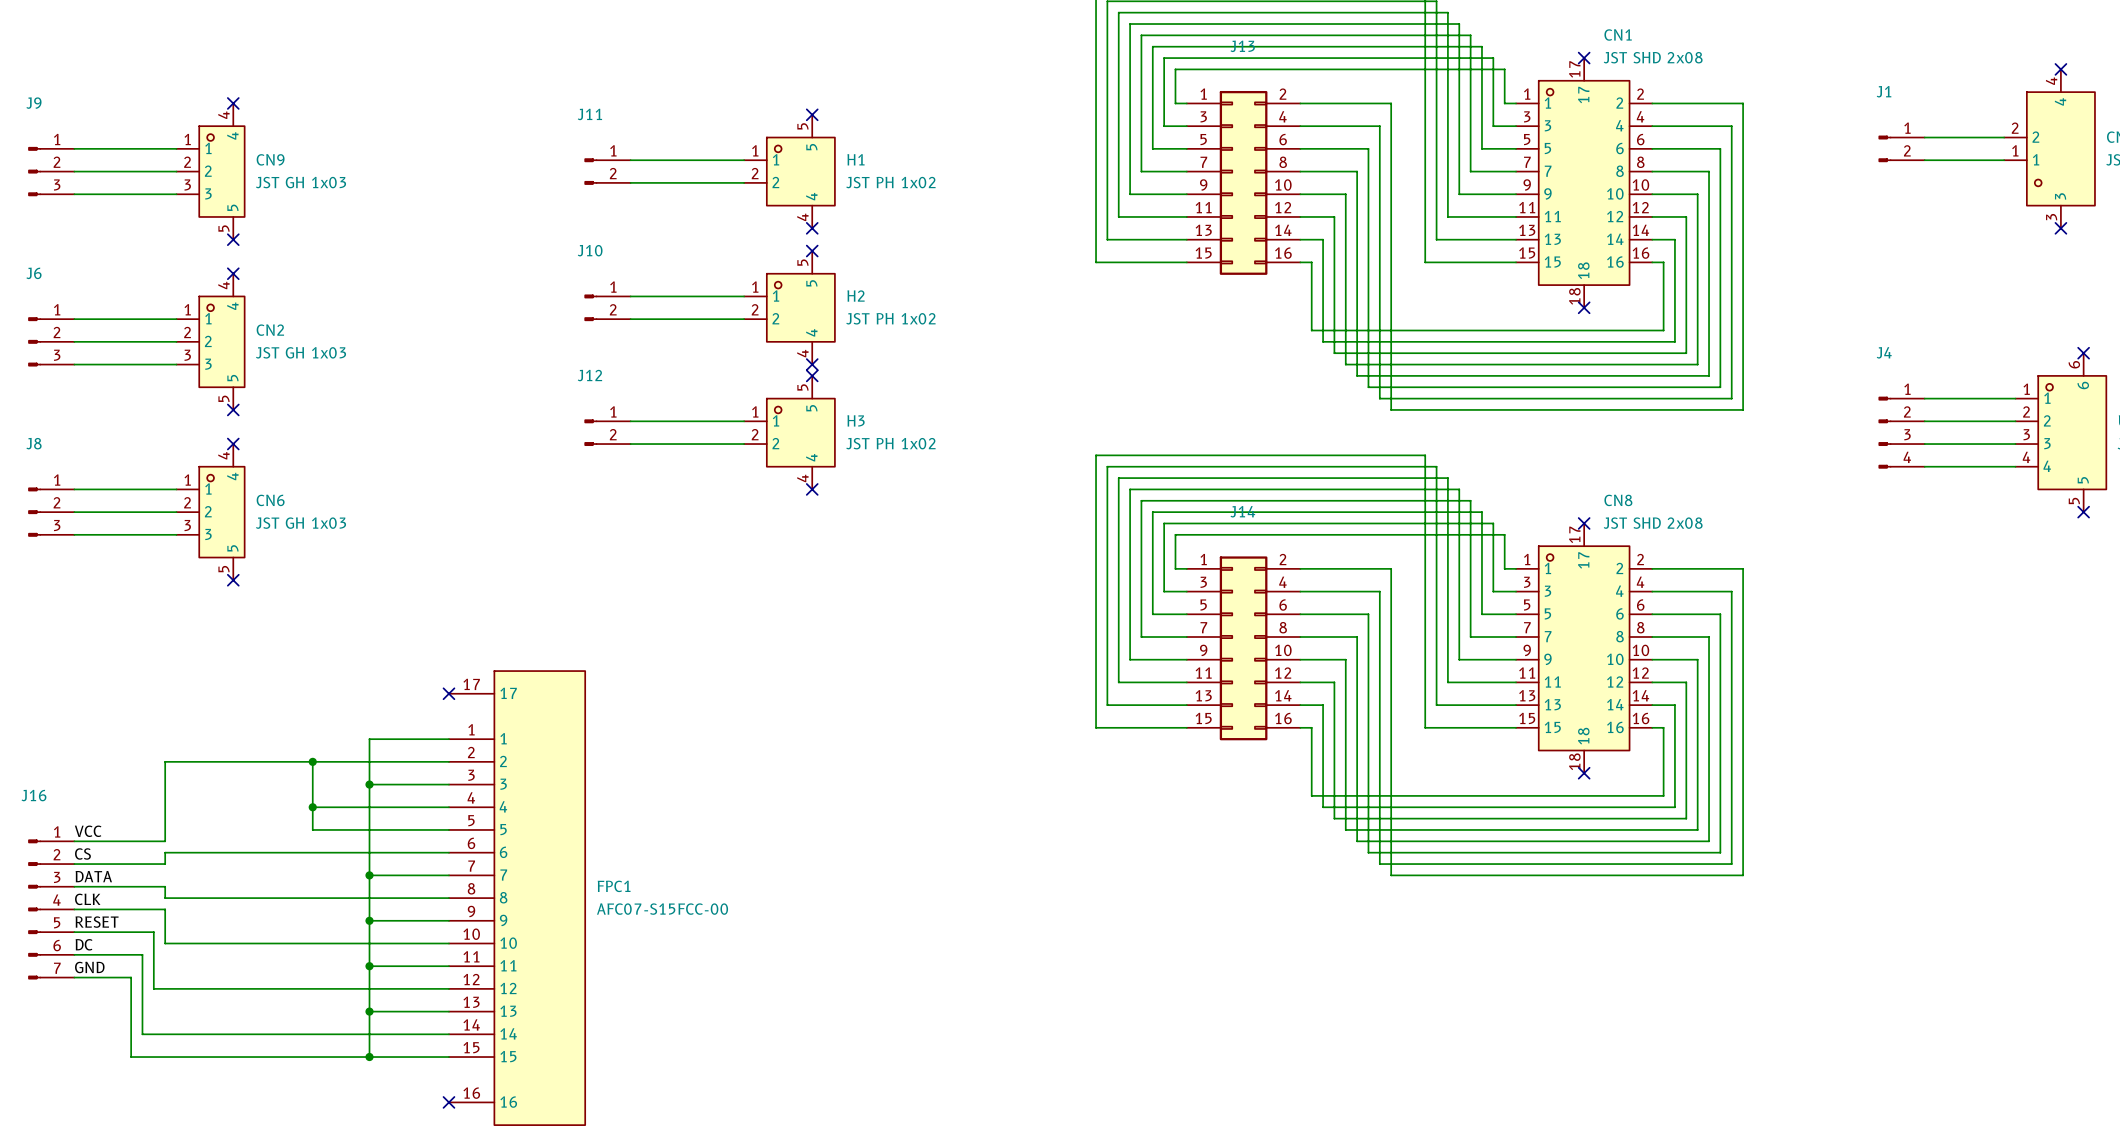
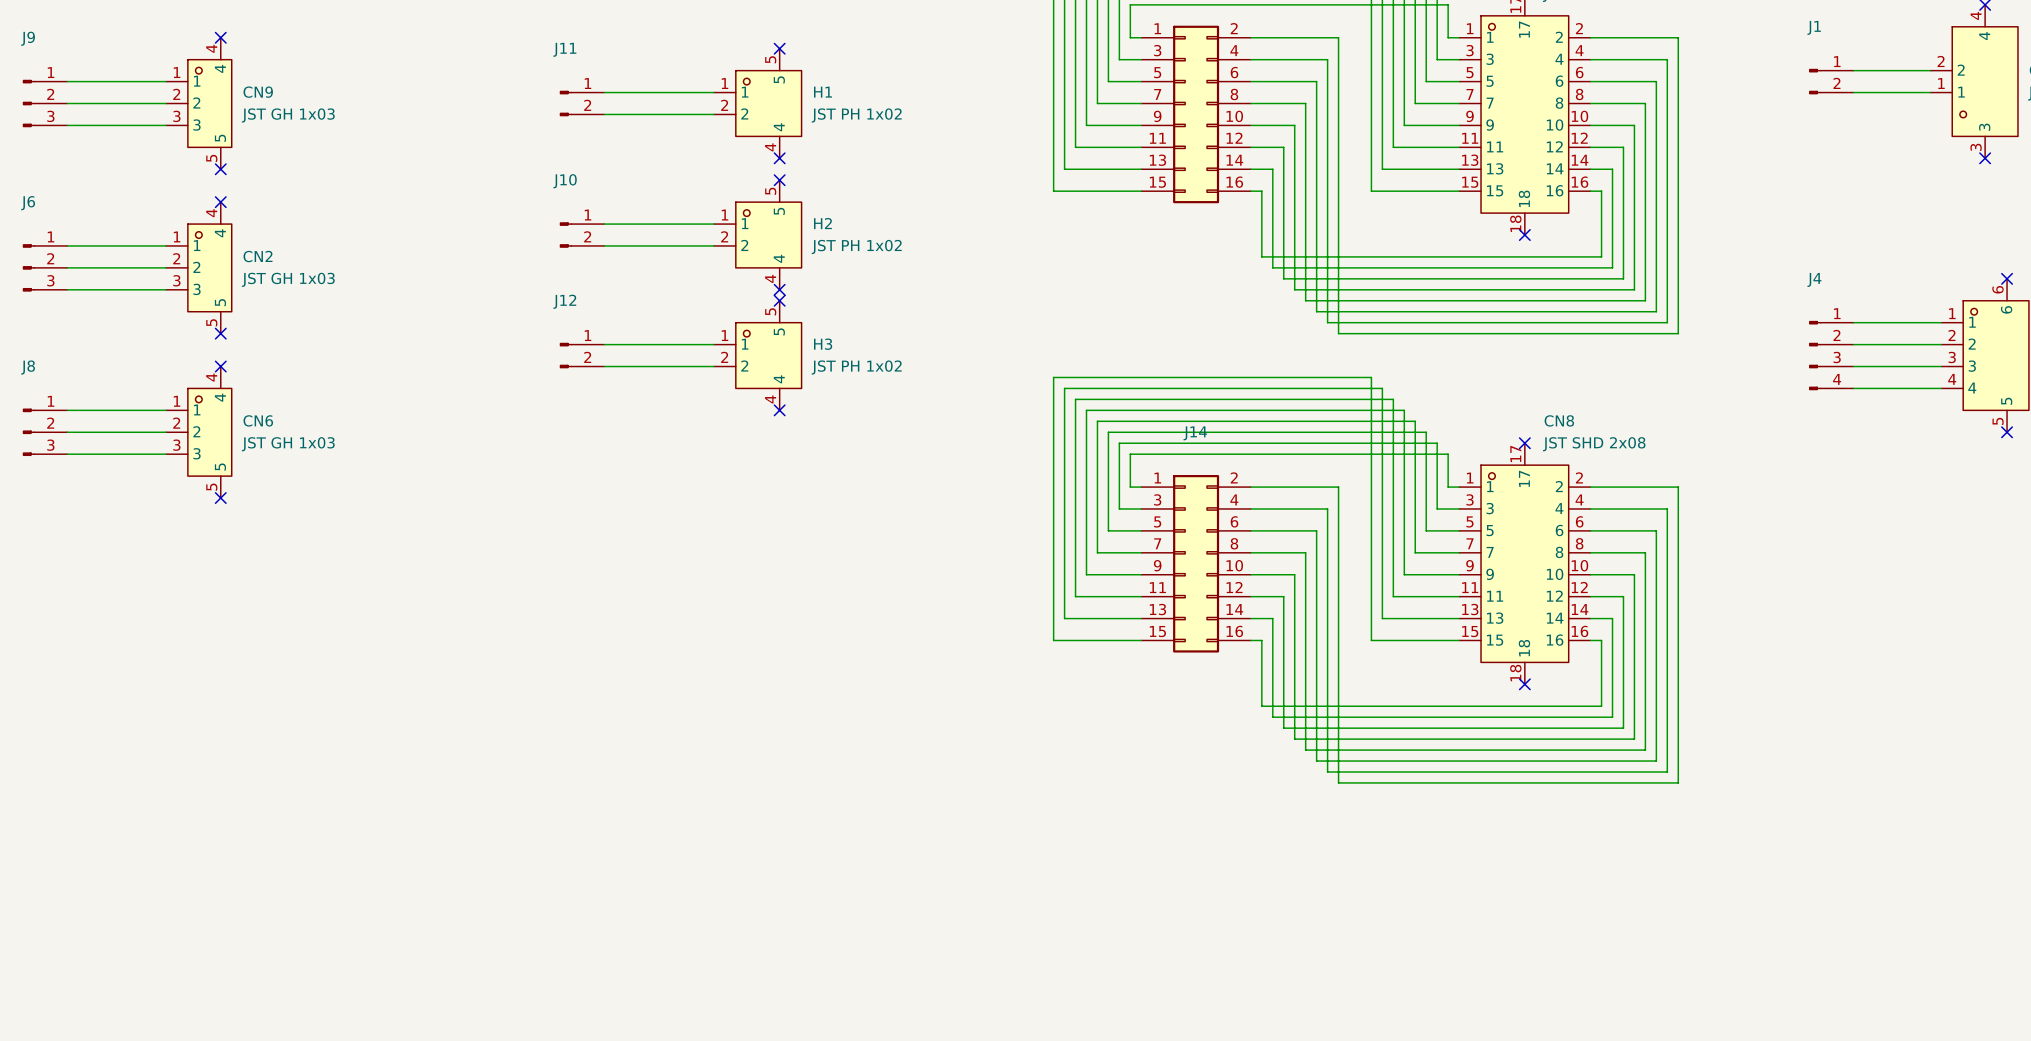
no-connect mark: (448, 693) -> none
wire: (448, 739) (369, 739) (369, 1057) -> none
wire: (312, 761) (312, 829) (448, 829) -> none
junction: (312, 761) -> none
wire: (448, 761) (165, 761) (165, 841) (74, 841) -> none
wire: (369, 784) (448, 784) -> none
junction: (369, 784) -> none
wire: (312, 807) (448, 807) -> none
junction: (312, 807) -> none
label: VCC (88, 831) -> none
wire: (448, 852) (165, 852) (165, 864) (74, 864) -> none
label: CS (82, 853) -> none
wire: (369, 875) (448, 875) -> none
junction: (369, 875) -> none
label: DATA (93, 876) -> none
wire: (74, 886) (165, 886) (165, 898) (448, 898) -> none
FPC1: AFC07-S15FCC-00 (517, 898) -> none
label: CLK (87, 899) -> none
J16: (51, 909) -> none
wire: (74, 909) (165, 909) (165, 943) (448, 943) -> none
wire: (369, 920) (448, 920) -> none
junction: (369, 920) -> none
label: RESET (97, 922) -> none
wire: (74, 932) (153, 932) (153, 988) (448, 988) -> none
label: DC (84, 944) -> none
wire: (74, 954) (142, 954) (142, 1034) (448, 1034) -> none
wire: (369, 966) (448, 966) -> none
junction: (369, 966) -> none
label: GND (89, 967) -> none
wire: (74, 977) (131, 977) (131, 1057) (448, 1057) -> none
wire: (369, 1011) (448, 1011) -> none
junction: (369, 1011) -> none
junction: (369, 1057) -> none
no-connect mark: (448, 1102) -> none

